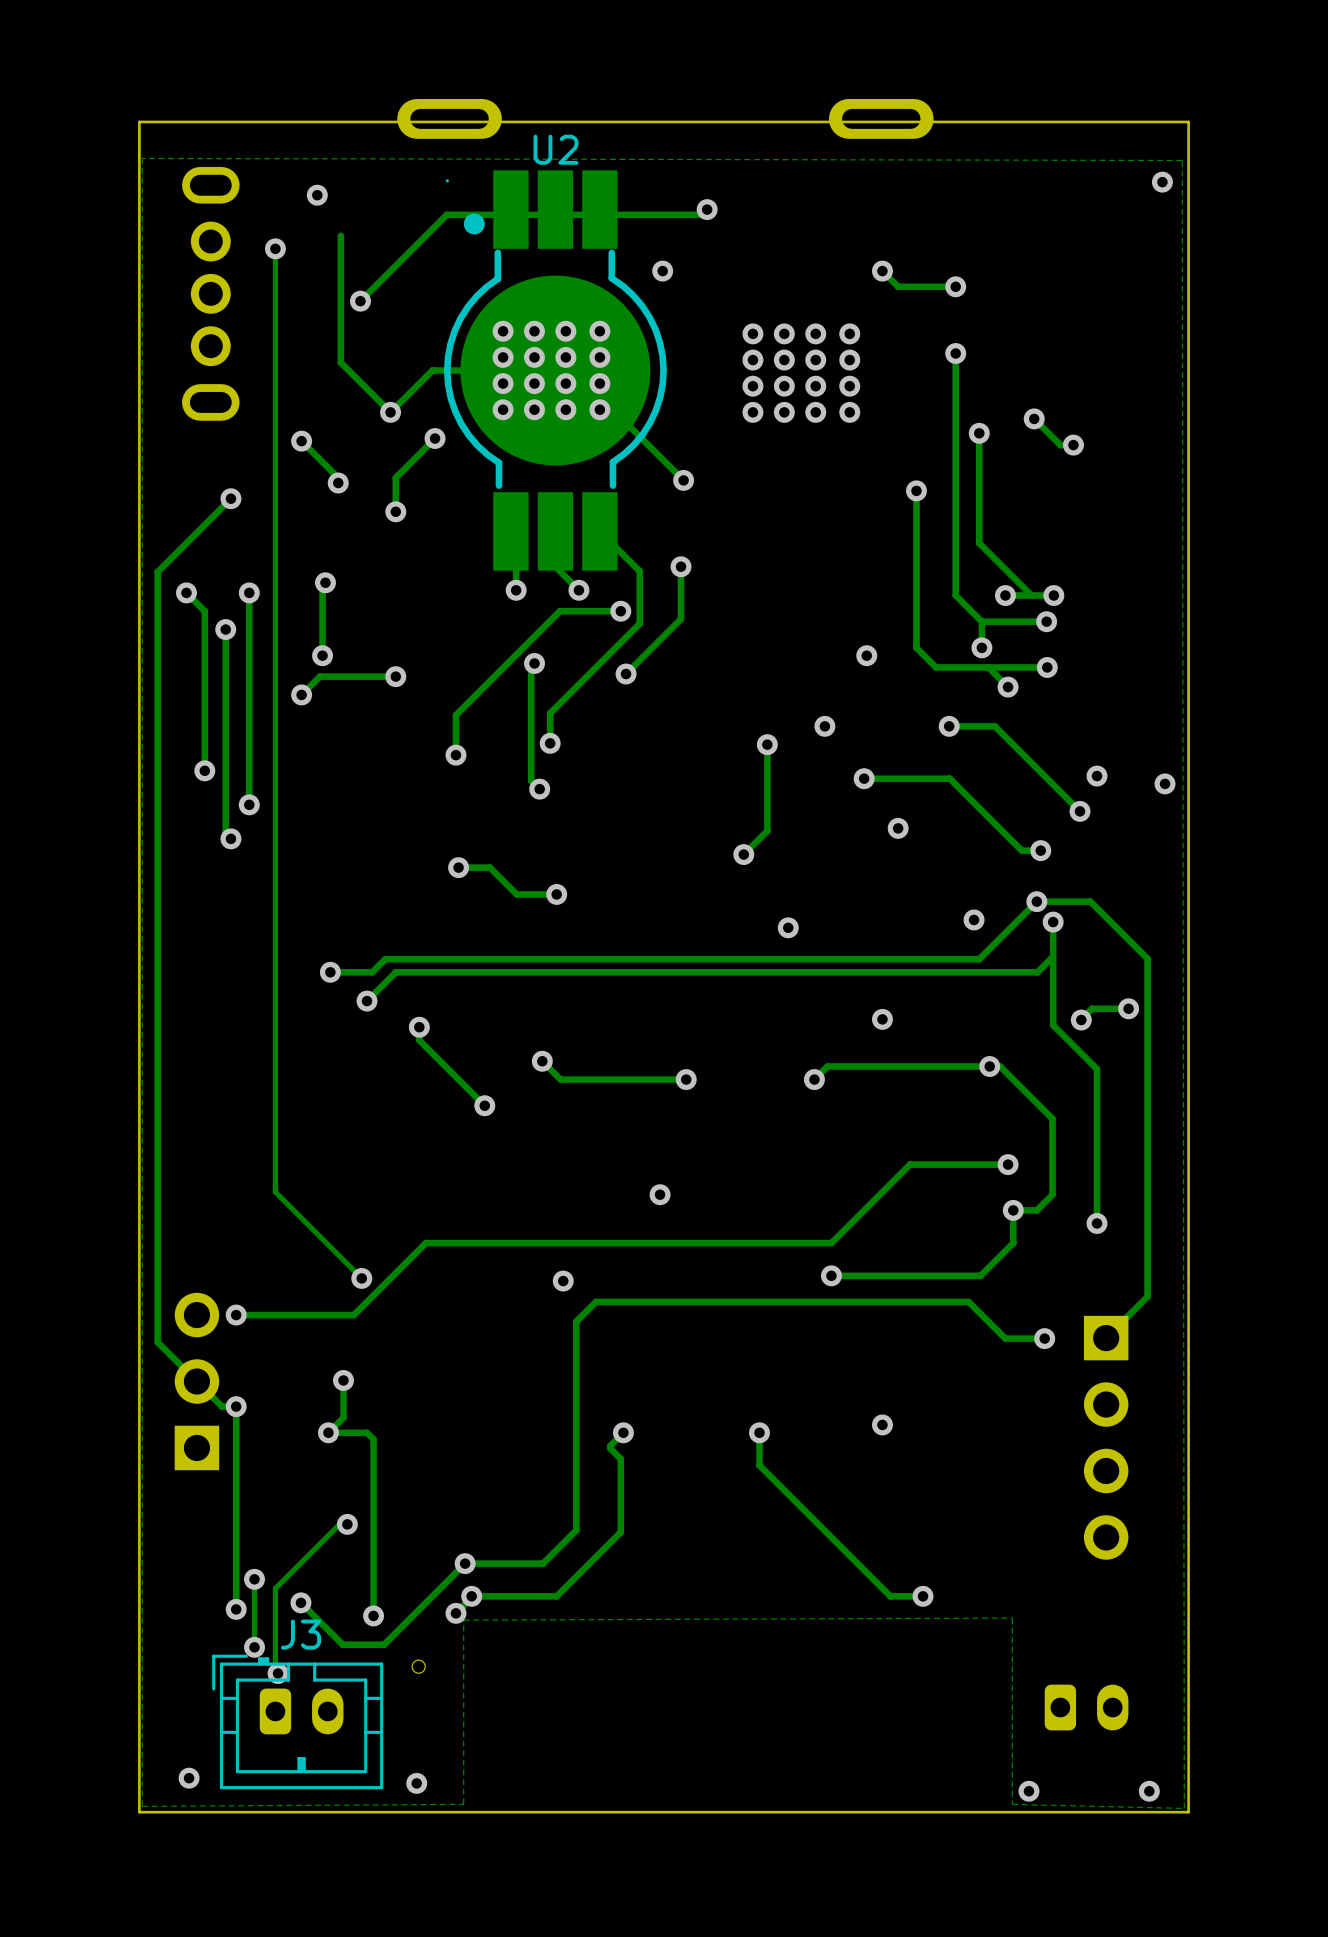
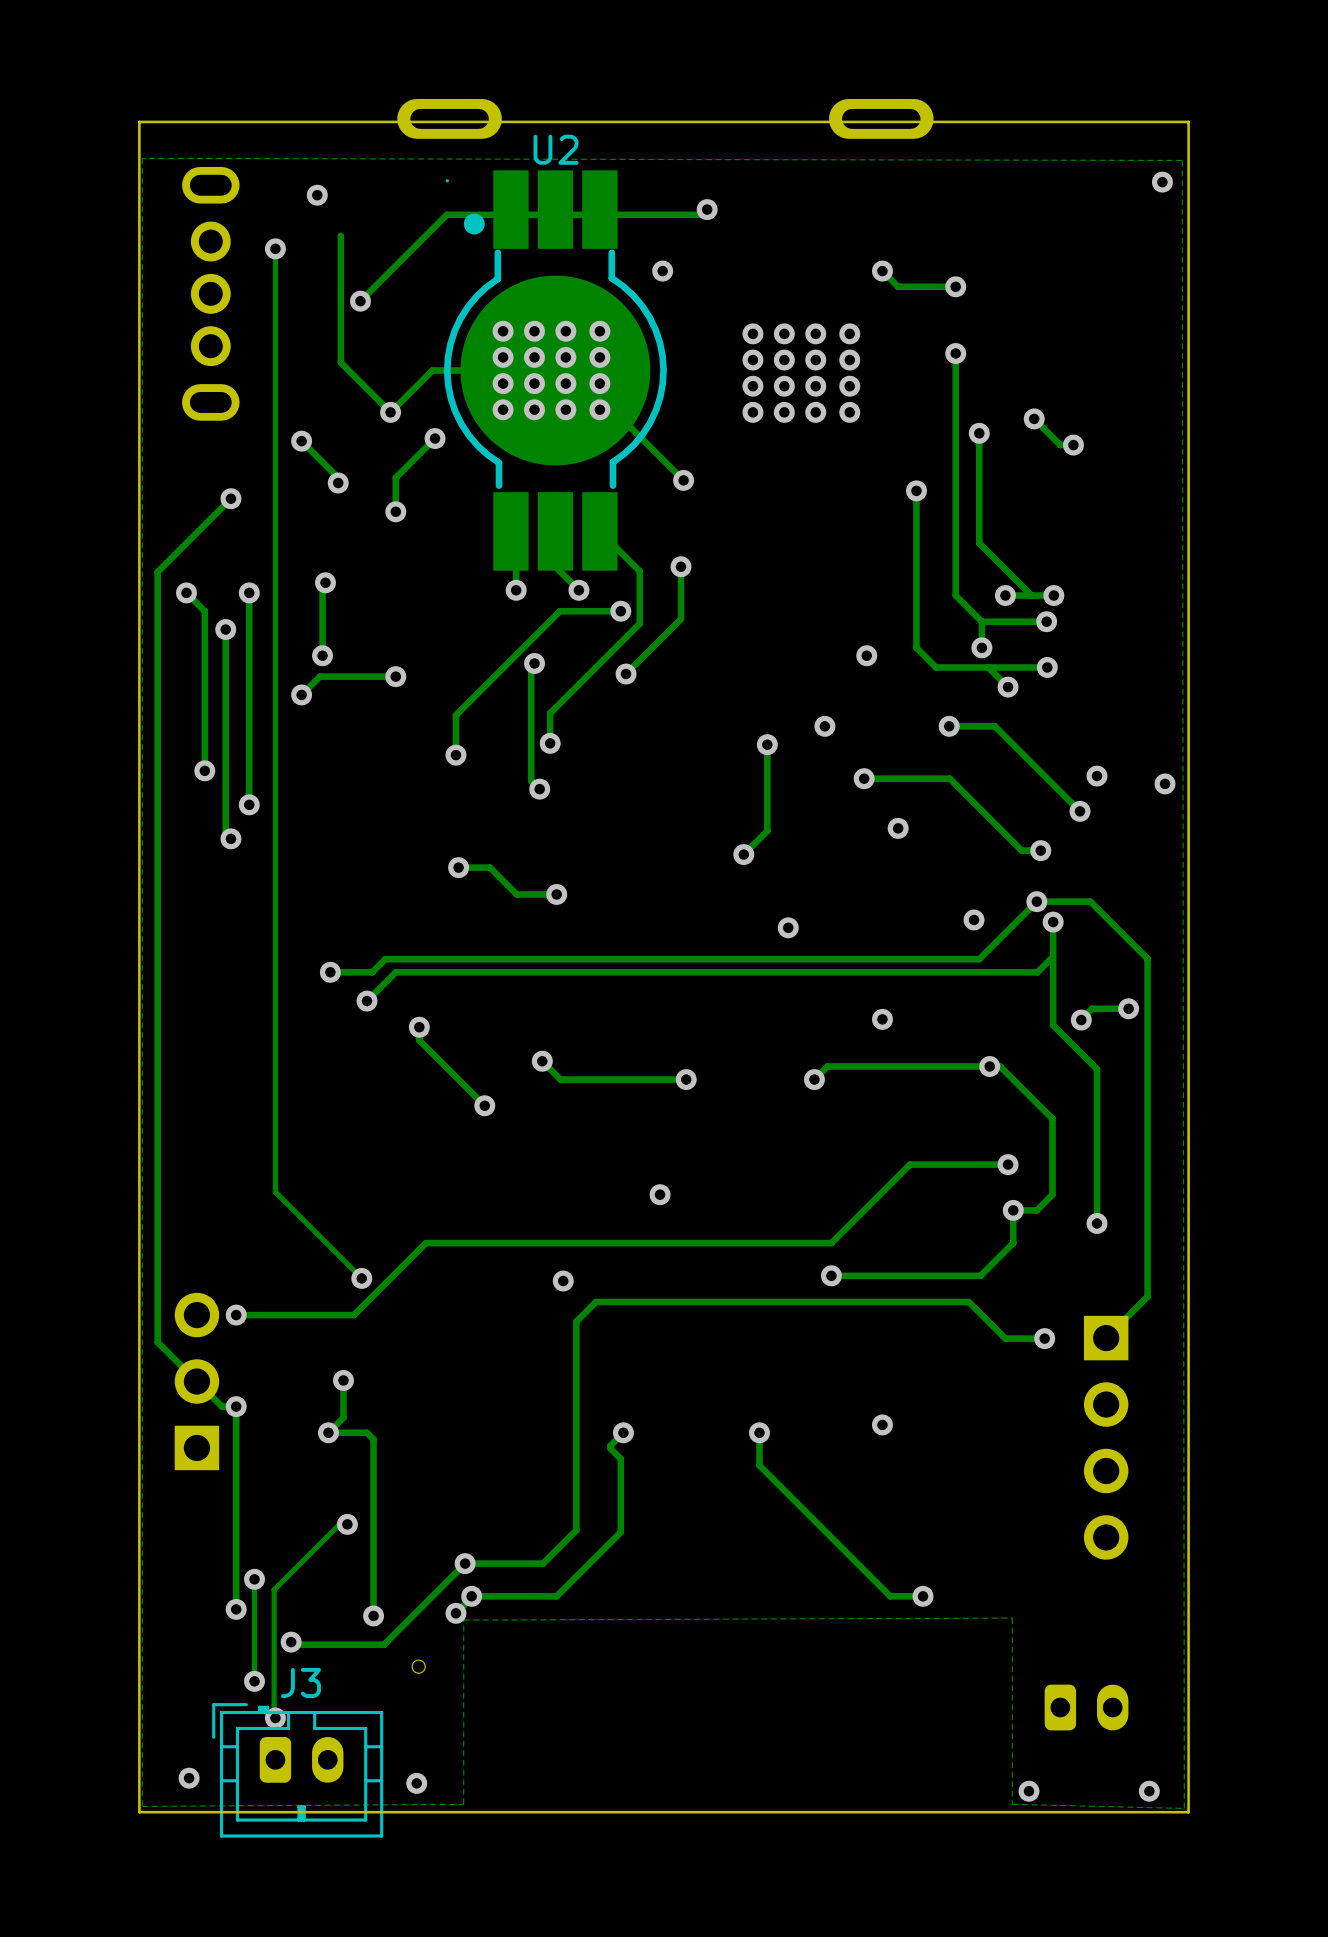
track: (275, 1588) (275, 1670) (278, 1673) -> (275, 1588) (274, 1716)
track: (300, 1602) (342, 1644) -> (291, 1642) (293, 1644) (342, 1644)
via: (300, 1602) -> none
via: none -> (291, 1642)
track: none -> (254, 1647) (254, 1681)
via: (254, 1647) -> none
via: (278, 1673) -> none
via: none -> (254, 1681)
via: none -> (275, 1717)
J3 position: (297, 1721) -> (297, 1770)

